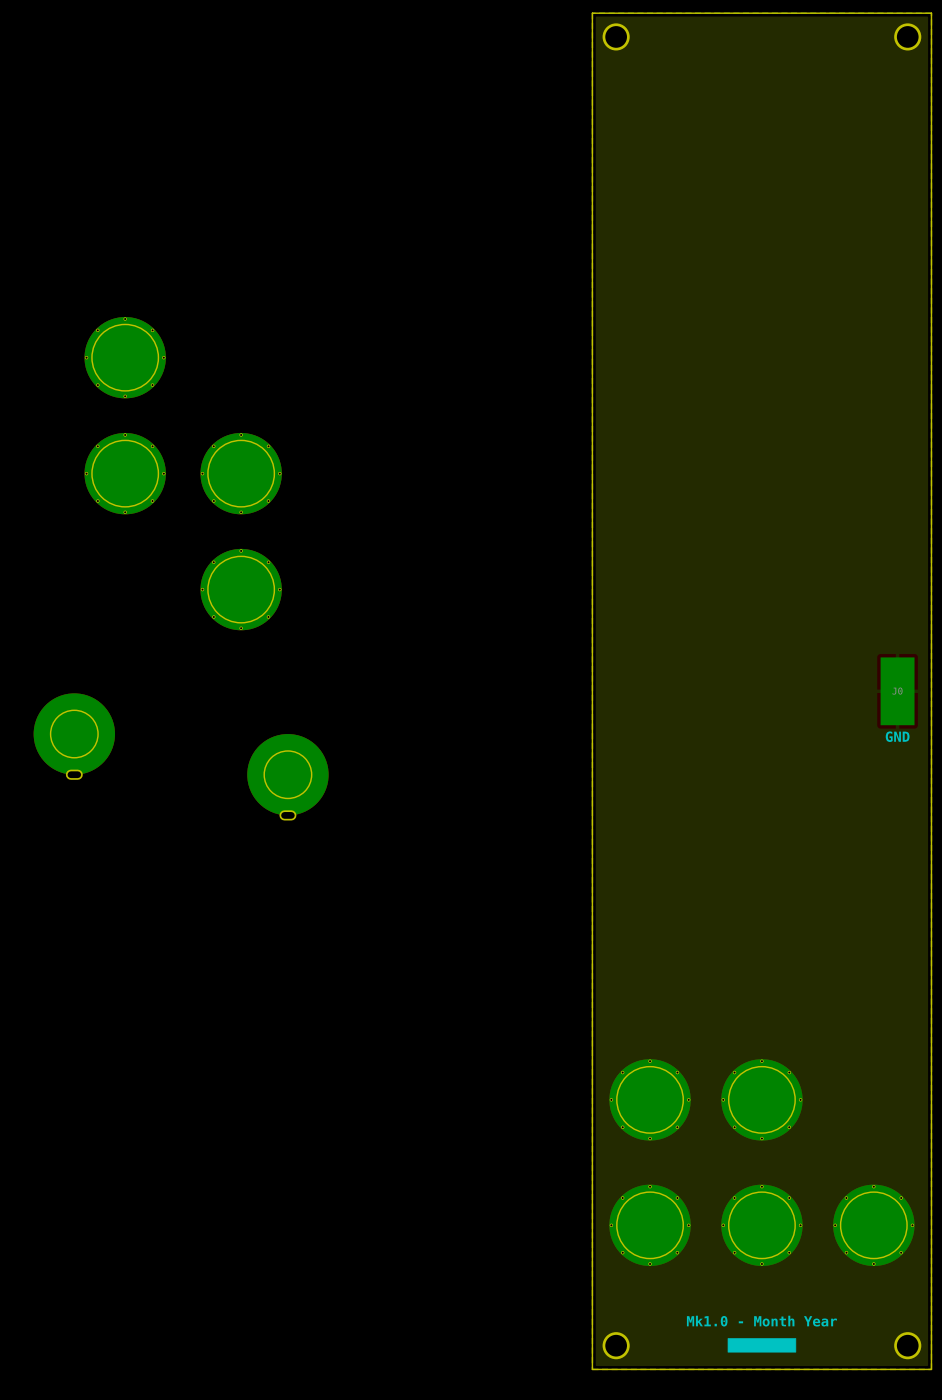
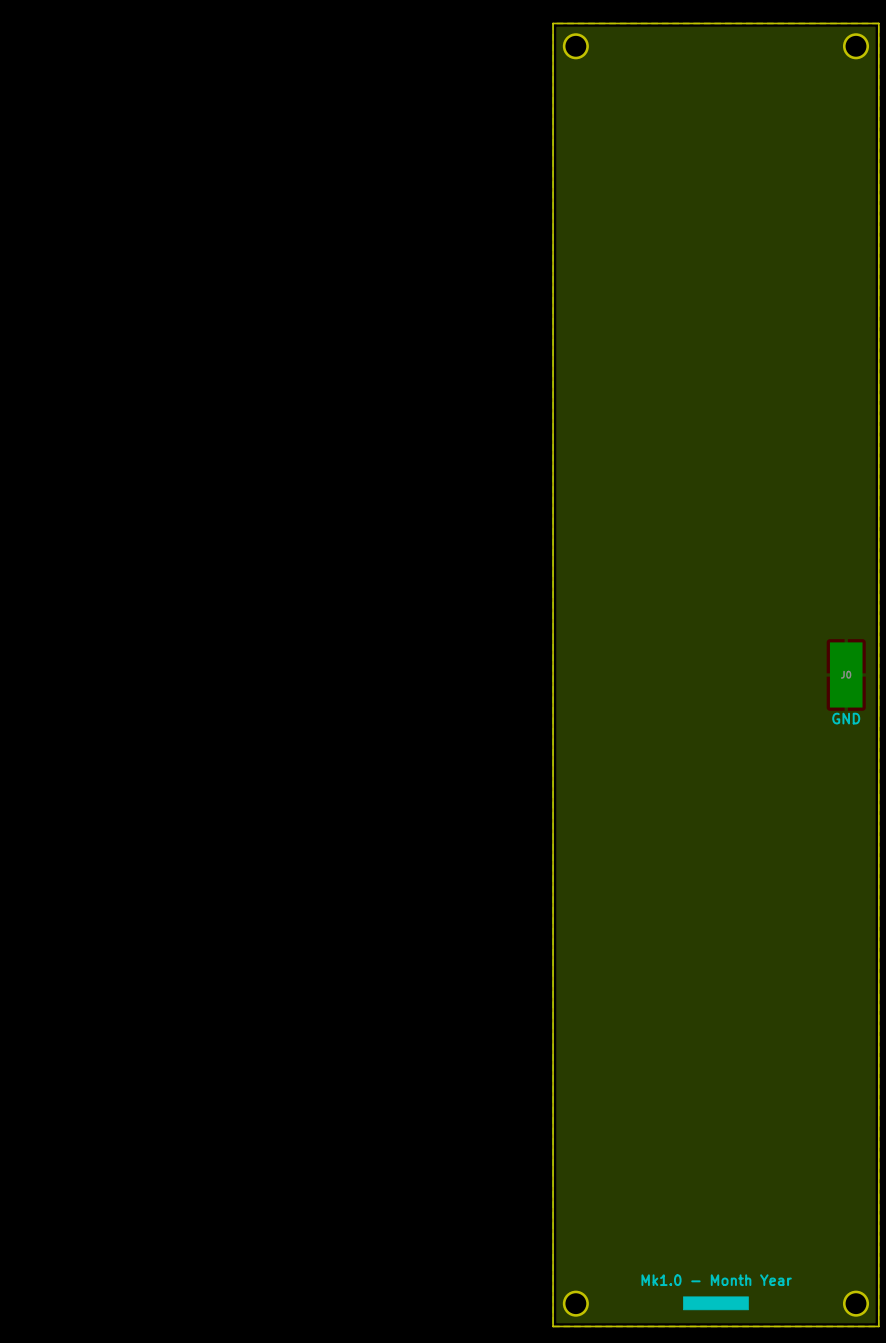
part: (125, 357) -> none
part: (125, 473) -> none
part: (241, 473) -> none
part: (241, 589) -> none
part: (74, 736) -> none
part: (287, 777) -> none
part: (650, 1099) -> none
part: (761, 1099) -> none
part: (650, 1225) -> none
part: (761, 1225) -> none
part: (873, 1225) -> none

